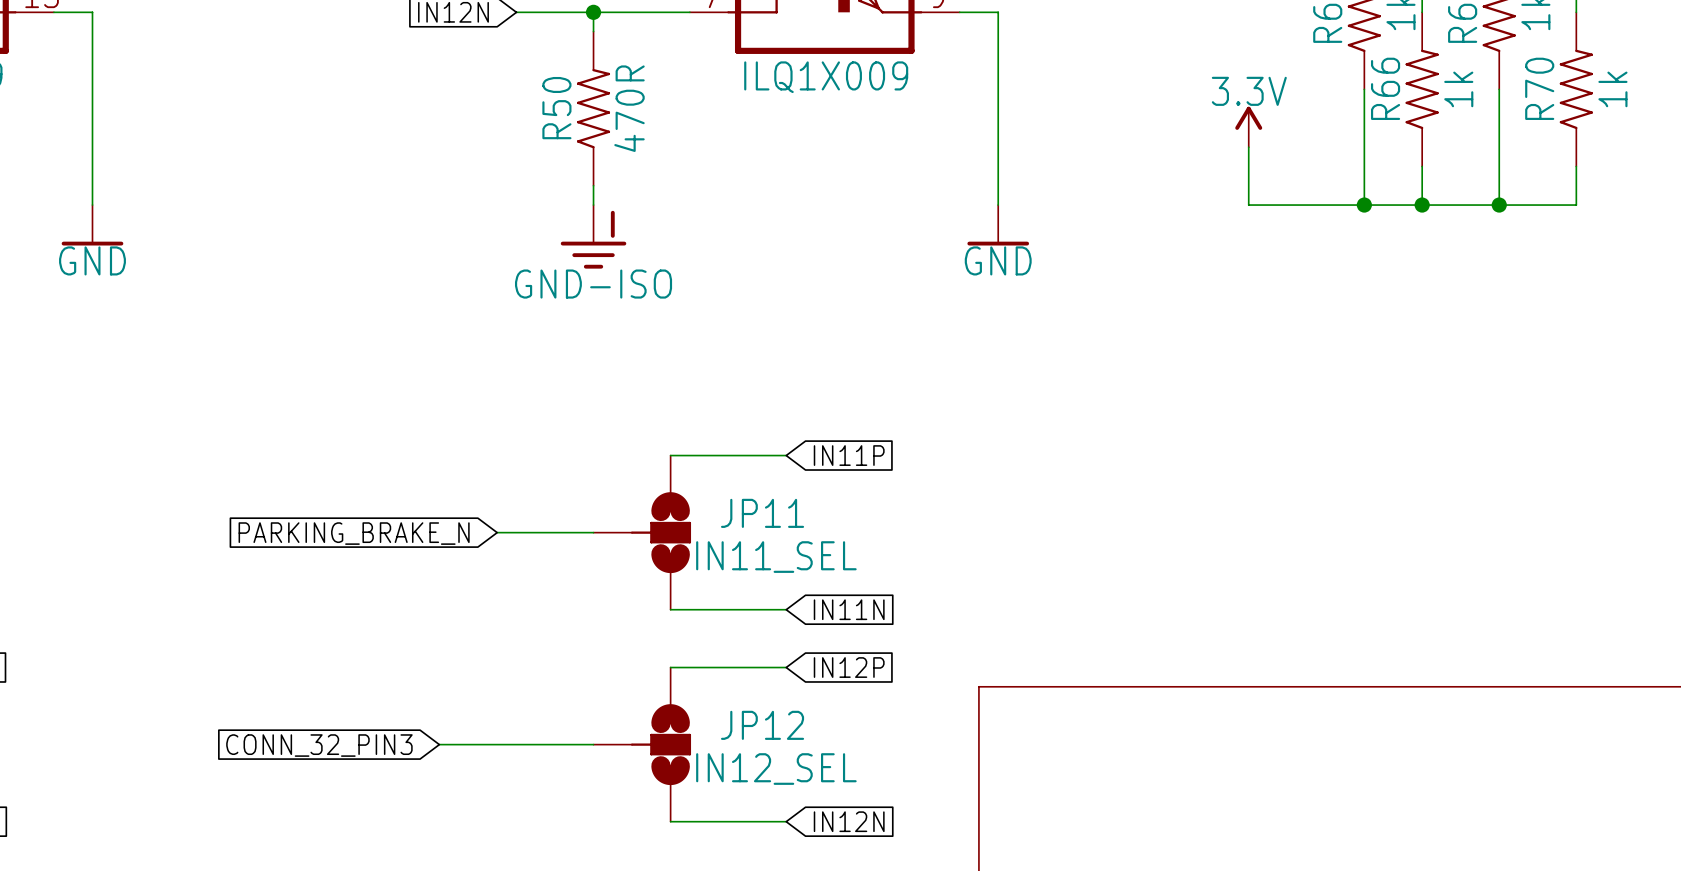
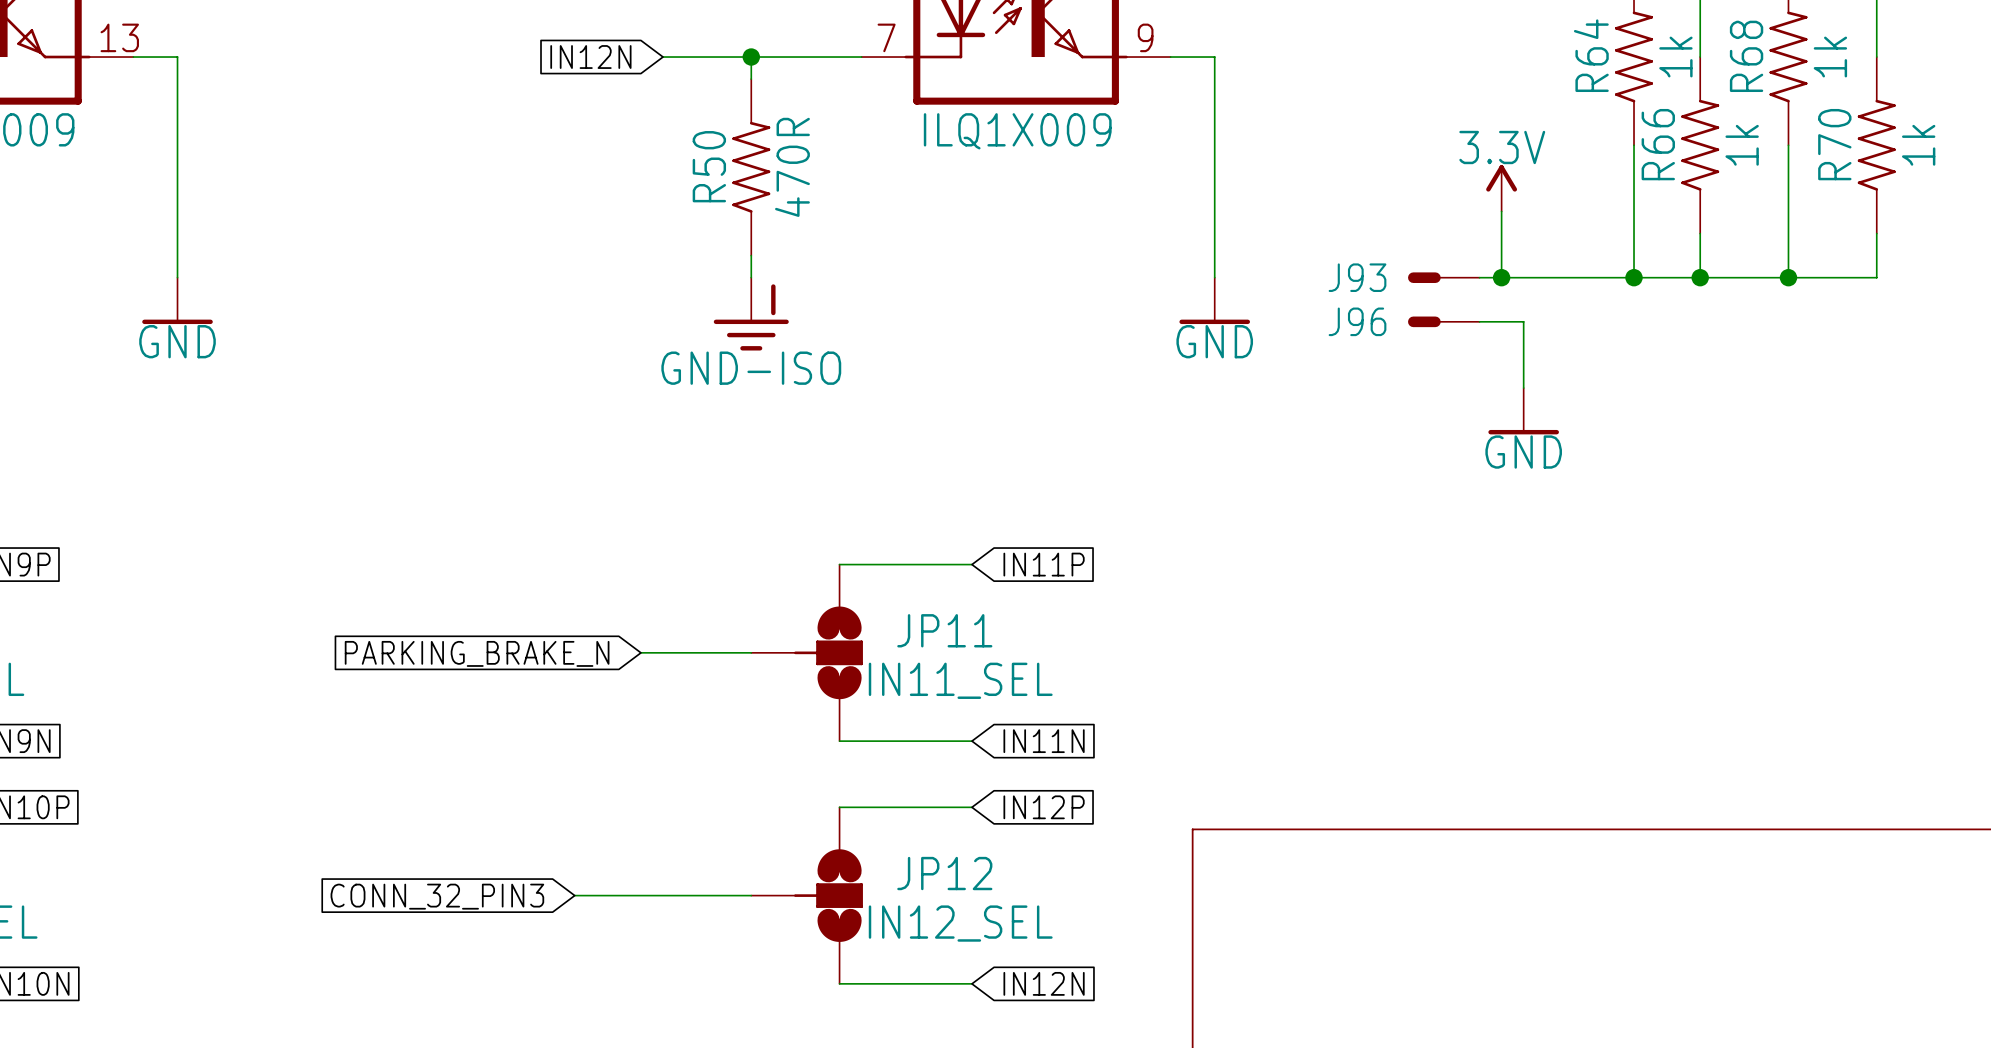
J93: none -> (1443, 277)
wire: none -> (1479, 277) (1501, 277)
junction: none -> (1501, 277)
J96: none -> (1443, 321)
wire: none -> (1479, 321) (1523, 321) (1523, 388)
power symbol: none -> GND (1523, 411)

